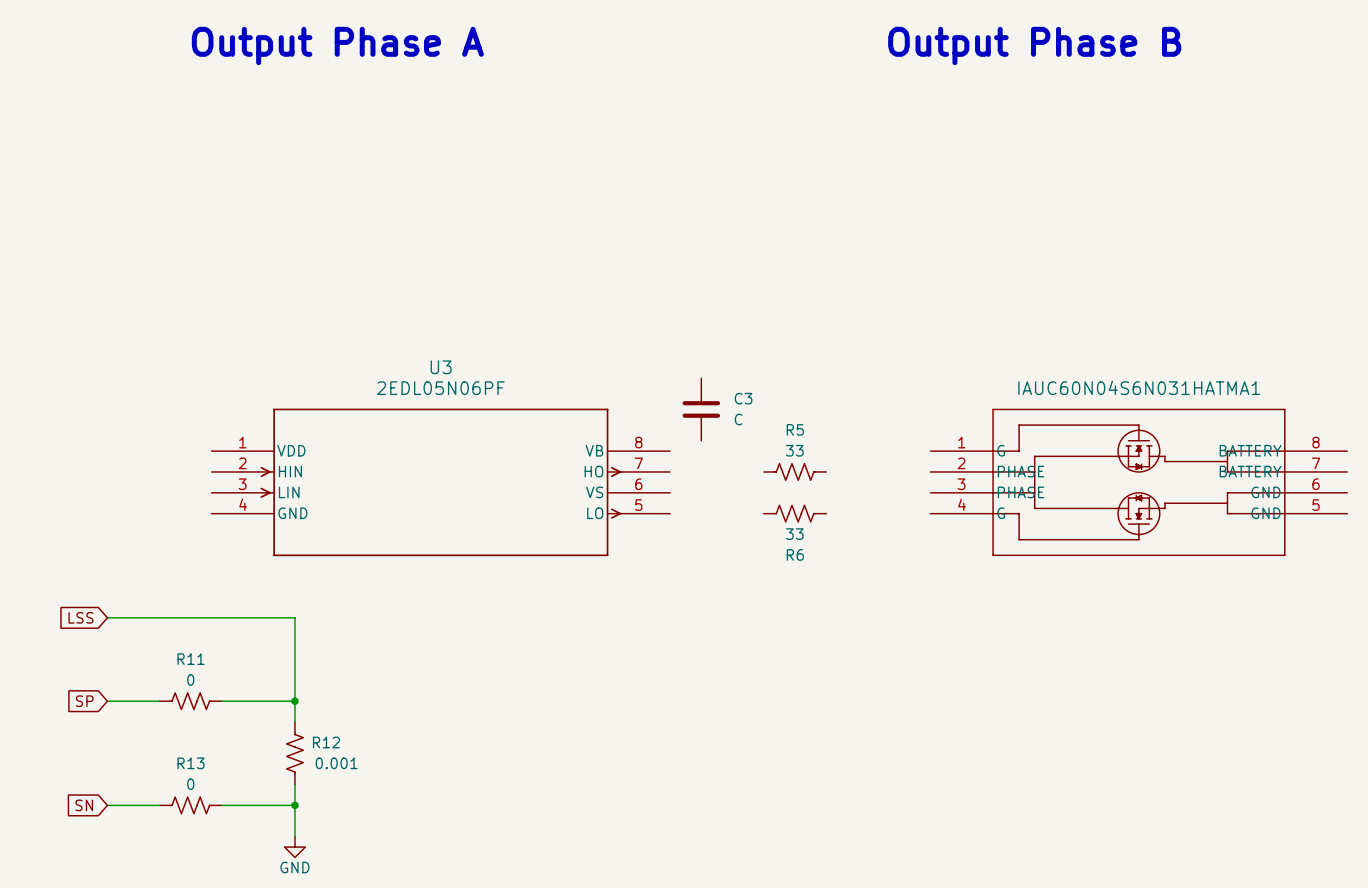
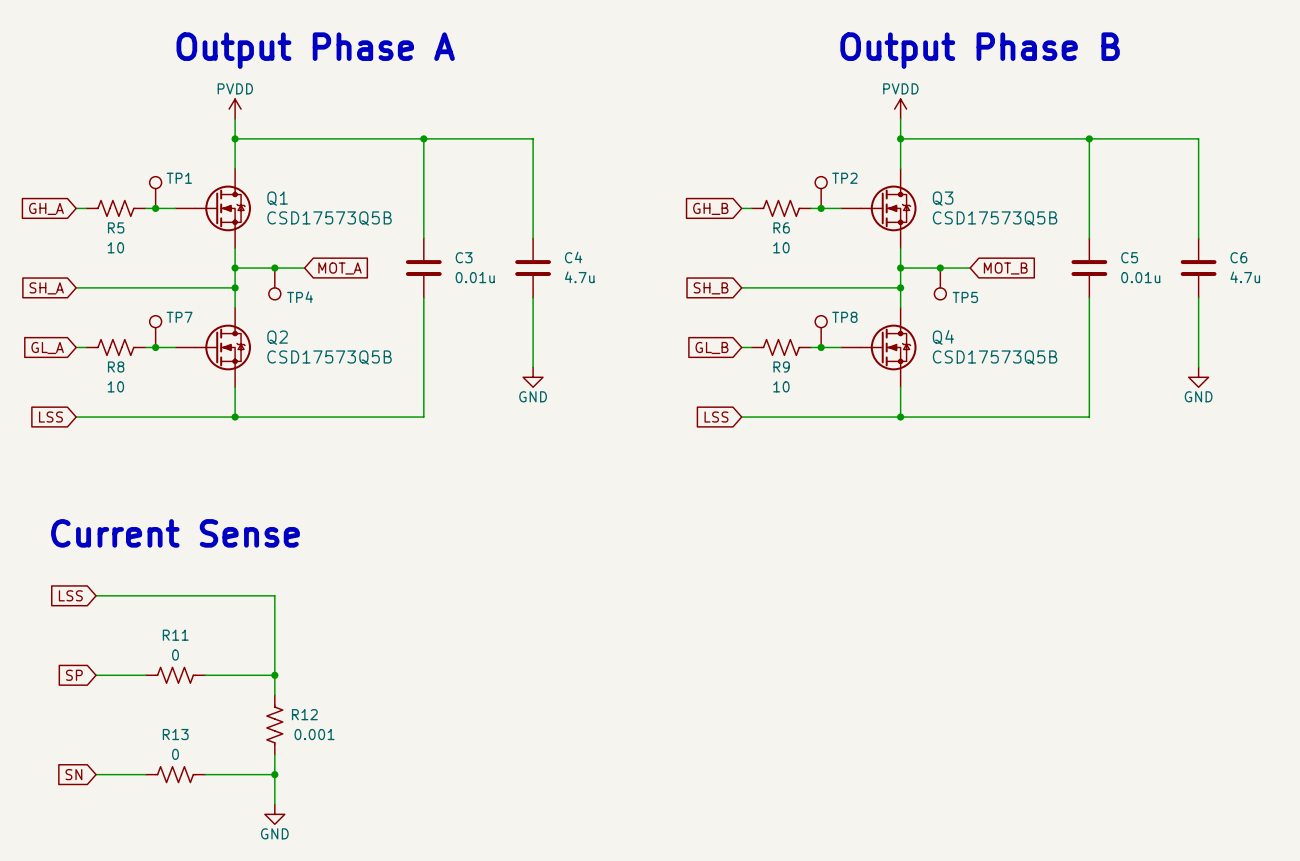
power symbol: none -> PVDD (235, 109)
power symbol: none -> PVDD (900, 109)
wire: none -> (235, 119) (235, 168)
wire: none -> (900, 119) (900, 168)
wire: none -> (235, 138) (533, 138) (533, 238)
junction: none -> (235, 138)
wire: none -> (423, 138) (423, 238)
junction: none -> (423, 138)
wire: none -> (900, 138) (1198, 138) (1198, 238)
junction: none -> (900, 138)
wire: none -> (1089, 138) (1089, 238)
junction: none -> (1089, 138)
TP1: none -> (155, 192)
TP2: none -> (821, 192)
wire: none -> (76, 208) (86, 208)
wire: none -> (145, 208) (175, 208)
junction: none -> (155, 208)
Q1: none -> CSD17573Q5B (213, 208)
wire: none -> (741, 208) (751, 208)
wire: none -> (811, 208) (841, 208)
junction: none -> (821, 208)
Q3: none -> CSD17573Q5B (878, 208)
global label: none -> GH_A (46, 208)
global label: none -> GH_B (710, 208)
wire: none -> (235, 248) (235, 307)
wire: none -> (900, 248) (900, 307)
wire: none -> (235, 268) (304, 268)
junction: none -> (235, 268)
junction: none -> (274, 268)
global label: none -> MOT_A (339, 268)
C4: none -> 4.7u (533, 268)
wire: none -> (900, 268) (970, 268)
junction: none -> (900, 268)
junction: none -> (940, 268)
global label: none -> MOT_B (1005, 268)
C5: none -> 0.01u (1089, 268)
C6: none -> 4.7u (1198, 268)
TP4: none -> (274, 283)
TP5: none -> (940, 283)
wire: none -> (76, 287) (235, 287)
junction: none -> (235, 287)
wire: none -> (741, 287) (900, 287)
junction: none -> (900, 287)
global label: none -> SH_A (46, 288)
global label: none -> SH_B (711, 288)
wire: none -> (423, 297) (423, 417) (76, 417)
wire: none -> (533, 297) (533, 367)
wire: none -> (1089, 297) (1089, 417) (741, 417)
wire: none -> (1198, 297) (1198, 367)
TP7: none -> (155, 331)
TP8: none -> (821, 331)
global label: none -> GL_A (47, 347)
wire: none -> (76, 347) (86, 347)
R8: none -> 10 (115, 347)
wire: none -> (145, 347) (175, 347)
junction: none -> (155, 347)
Q2: none -> CSD17573Q5B (213, 347)
global label: none -> GL_B (711, 347)
wire: none -> (741, 347) (751, 347)
R9: none -> 10 (781, 347)
wire: none -> (811, 347) (841, 347)
junction: none -> (821, 347)
Q4: none -> CSD17573Q5B (878, 347)
power symbol: none -> GND (533, 377)
power symbol: none -> GND (1198, 377)
wire: none -> (235, 387) (235, 417)
wire: none -> (900, 387) (900, 417)
C3 position: (701, 409) -> (423, 268)
C3 value: C (738, 419) -> 0.01u (475, 277)
R5 name position: R5 (795, 429) -> R5 (116, 227)
global label: none -> LSS (50, 417)
junction: none -> (235, 417)
global label: none -> LSS (716, 417)
junction: none -> (900, 417)
R5 value: 33 (794, 450) -> 10 (115, 247)
R5 position: (795, 471) -> (115, 208)
U3: 2EDL05N06PF (440, 482) -> none
part: IAUC60N04S6N031HATMA1 (1138, 482) -> none
R6 position: (795, 513) -> (781, 208)
R6 value: 33 (794, 534) -> 10 (781, 247)
text: none -> Current Sense (175, 533)
R6 name position: R6 (795, 554) -> R6 (781, 227)

